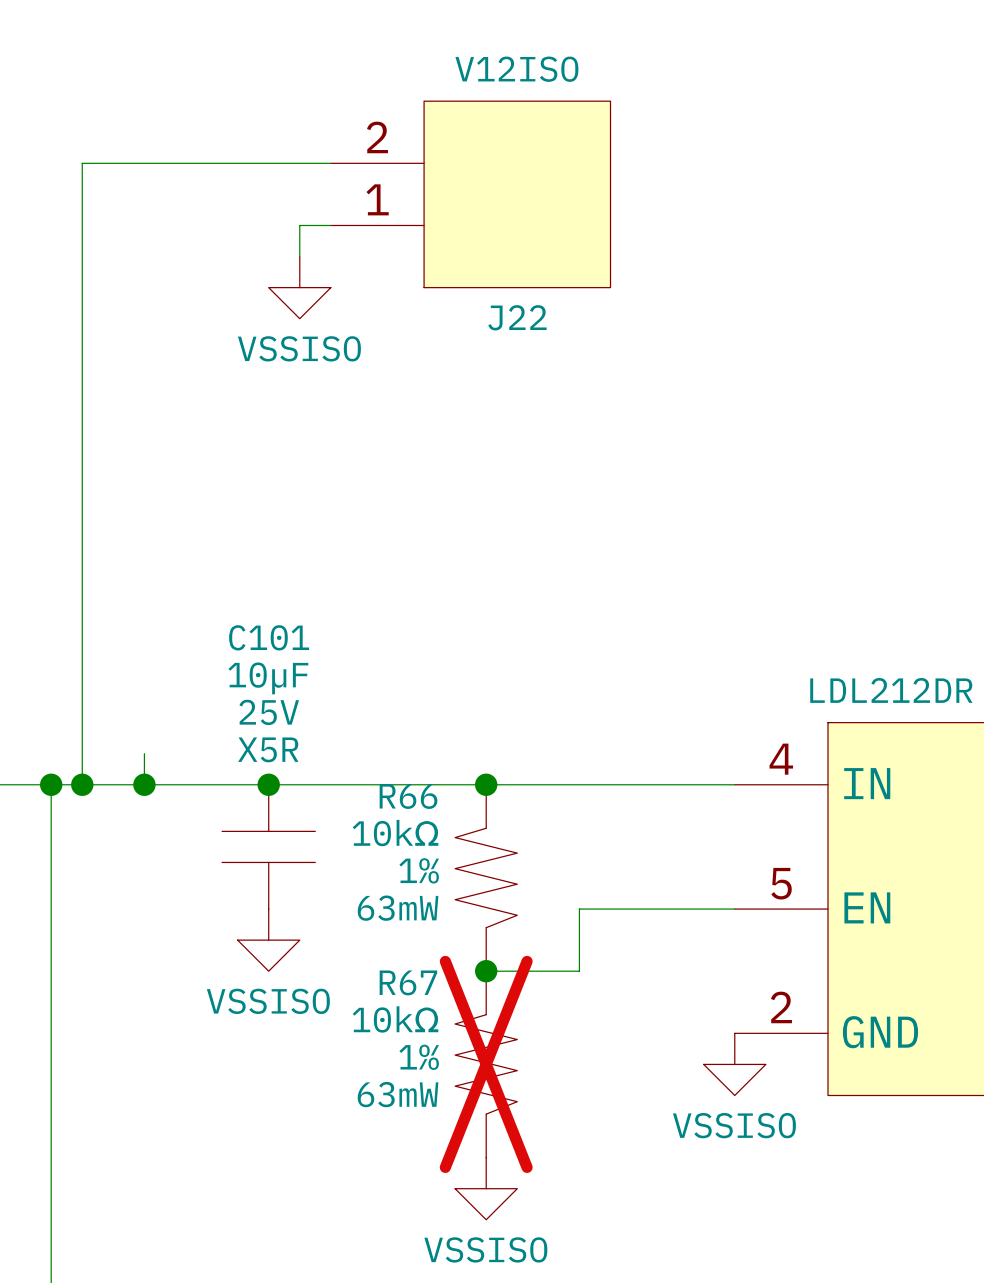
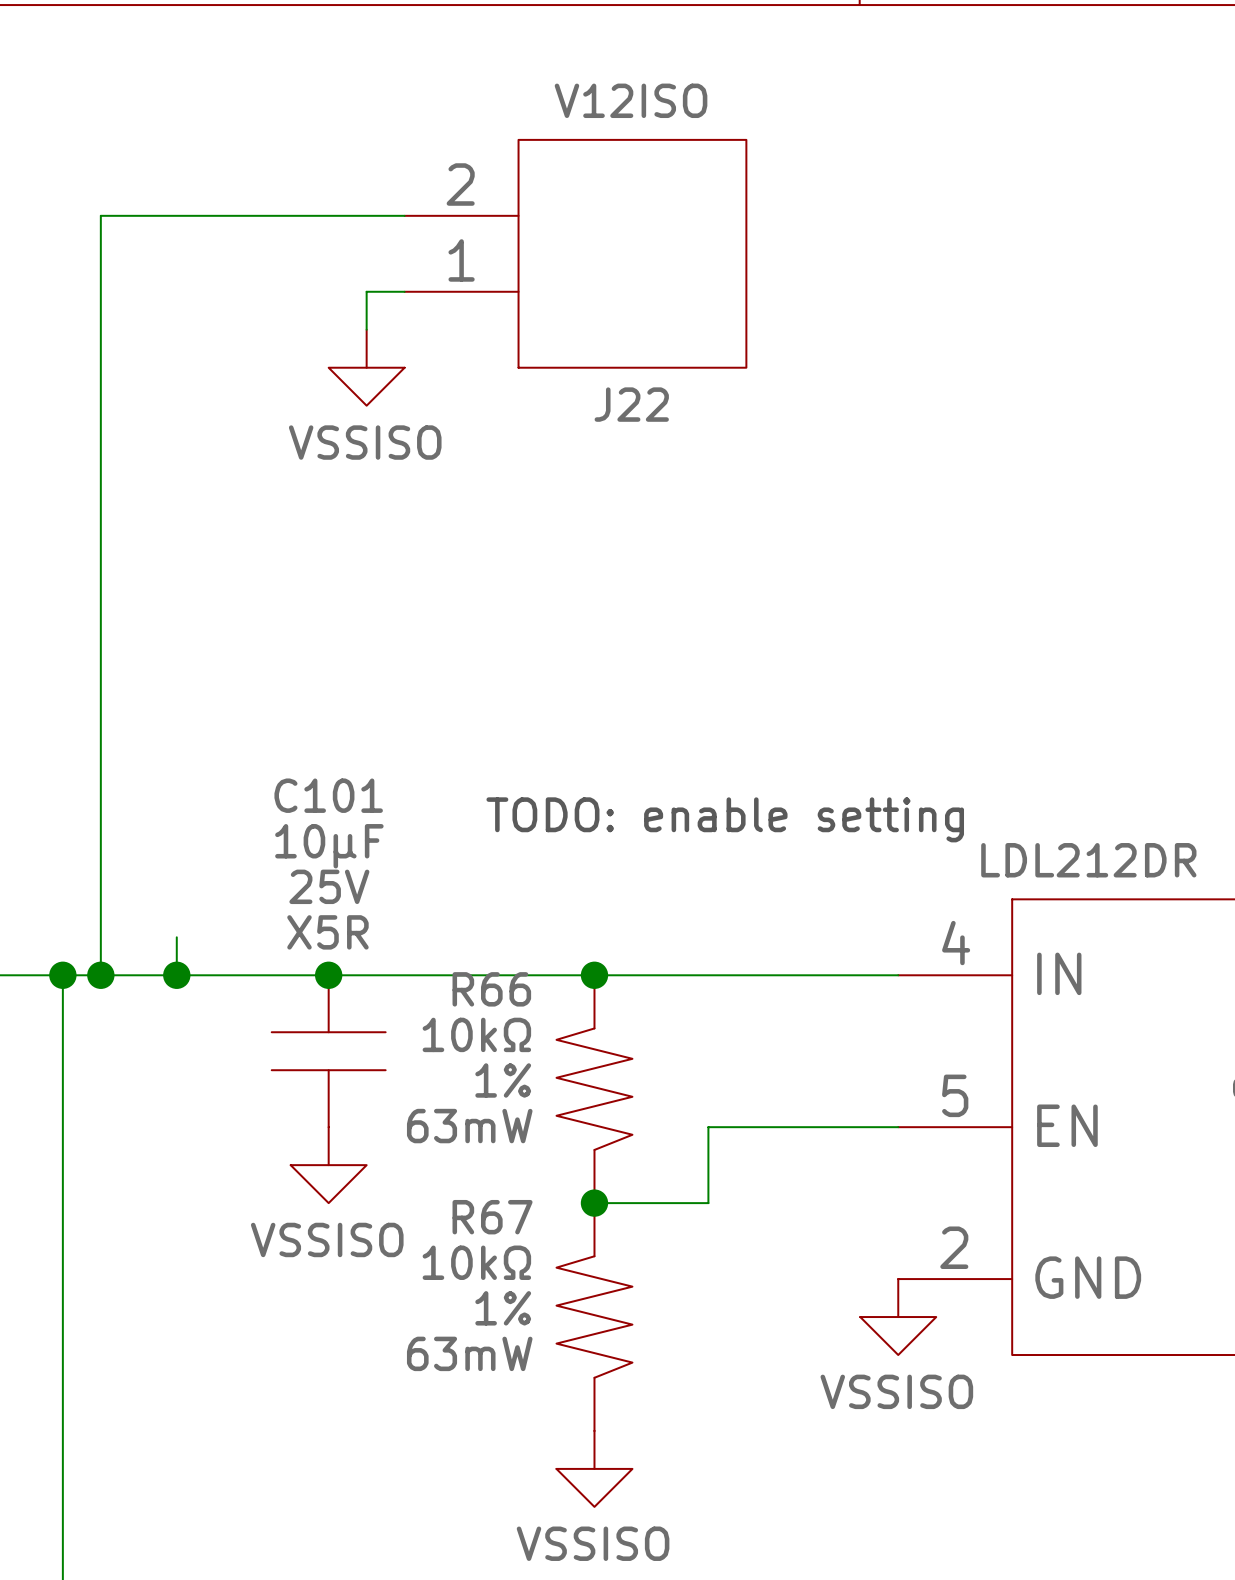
text: none -> TODO: enable setting (725, 819)
R67 do-not-place cross: (486, 1064) -> none

